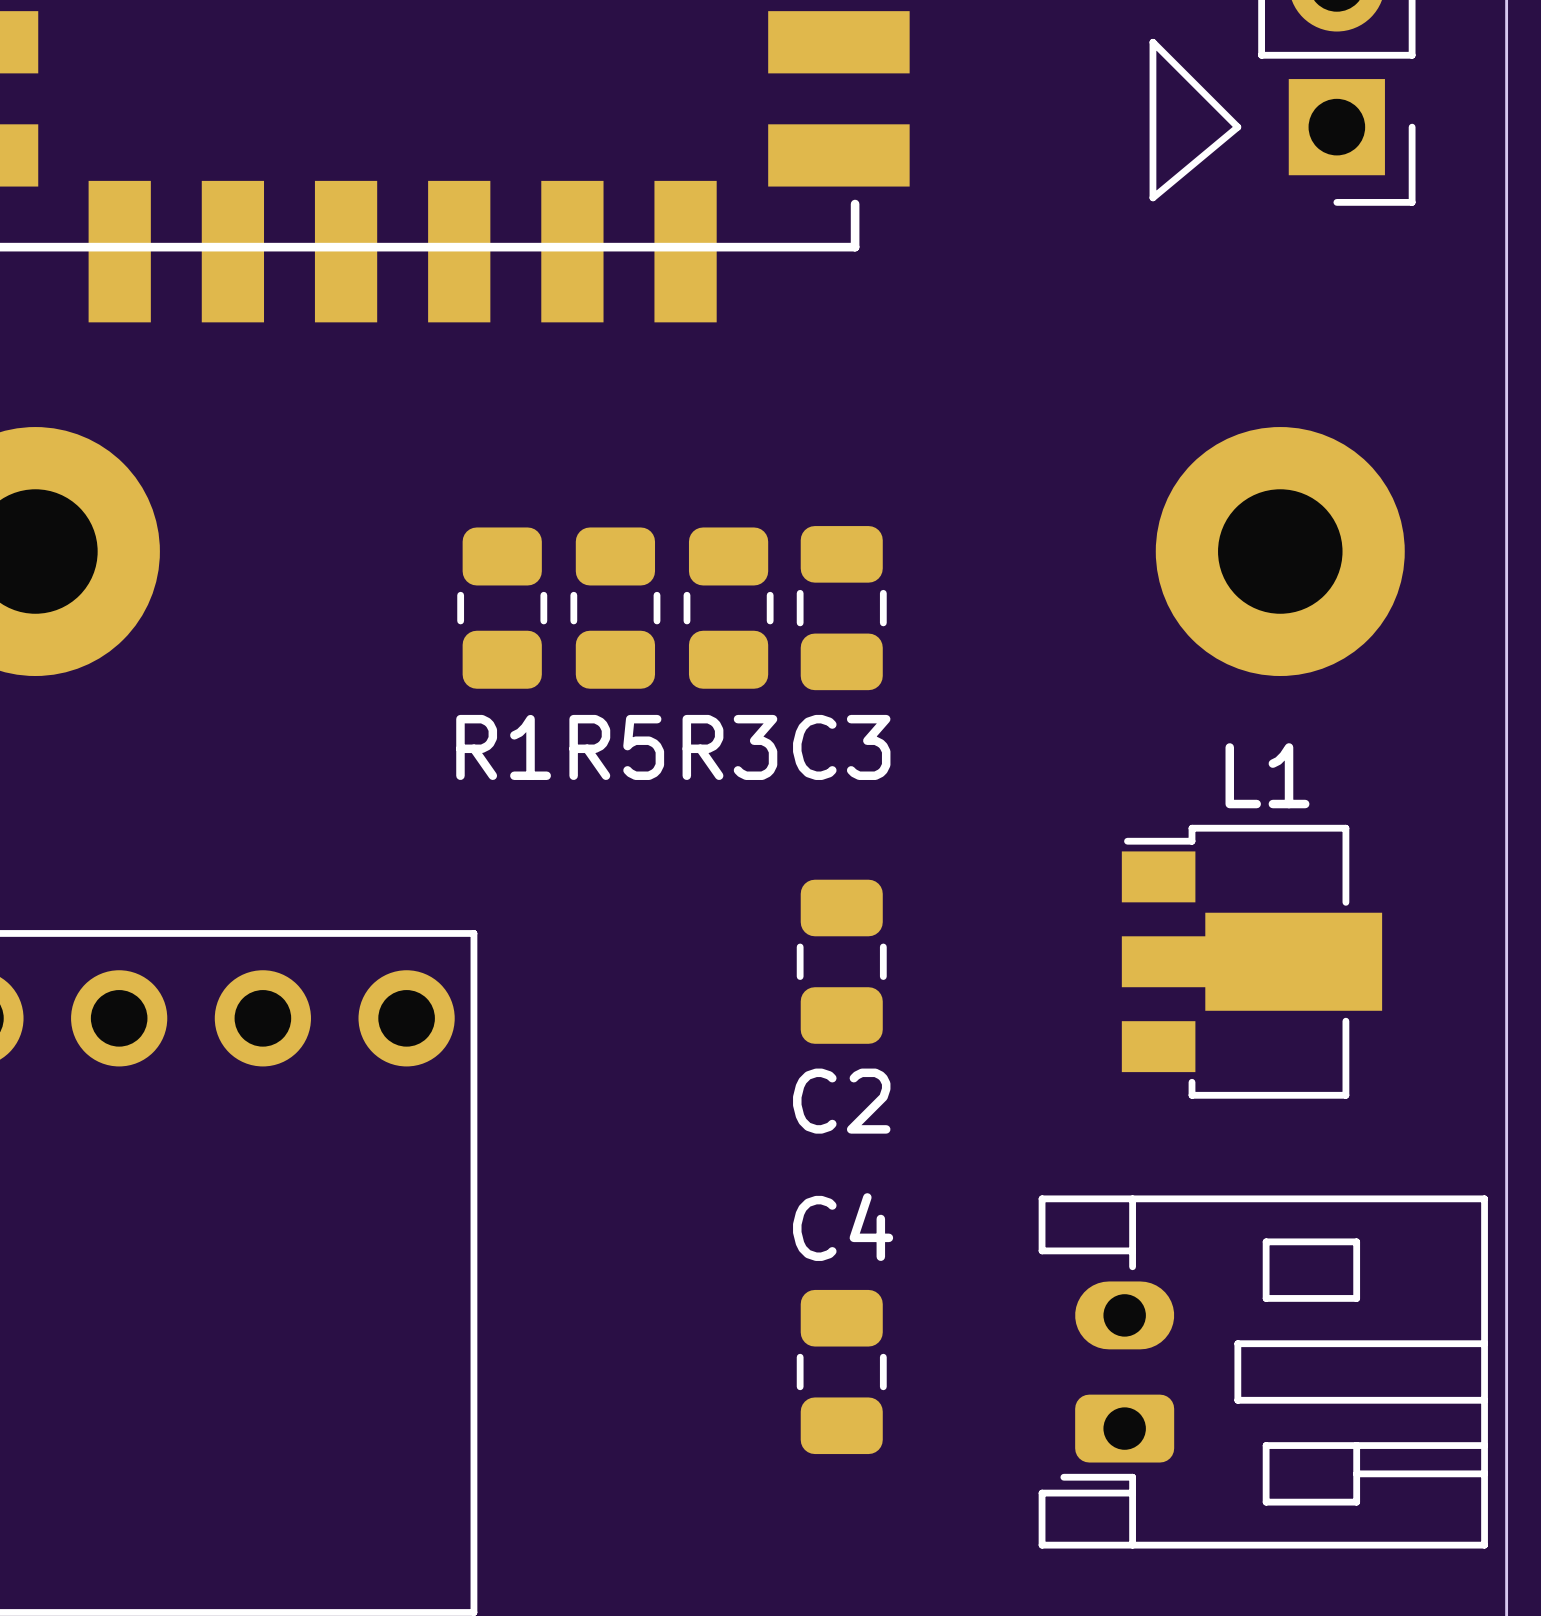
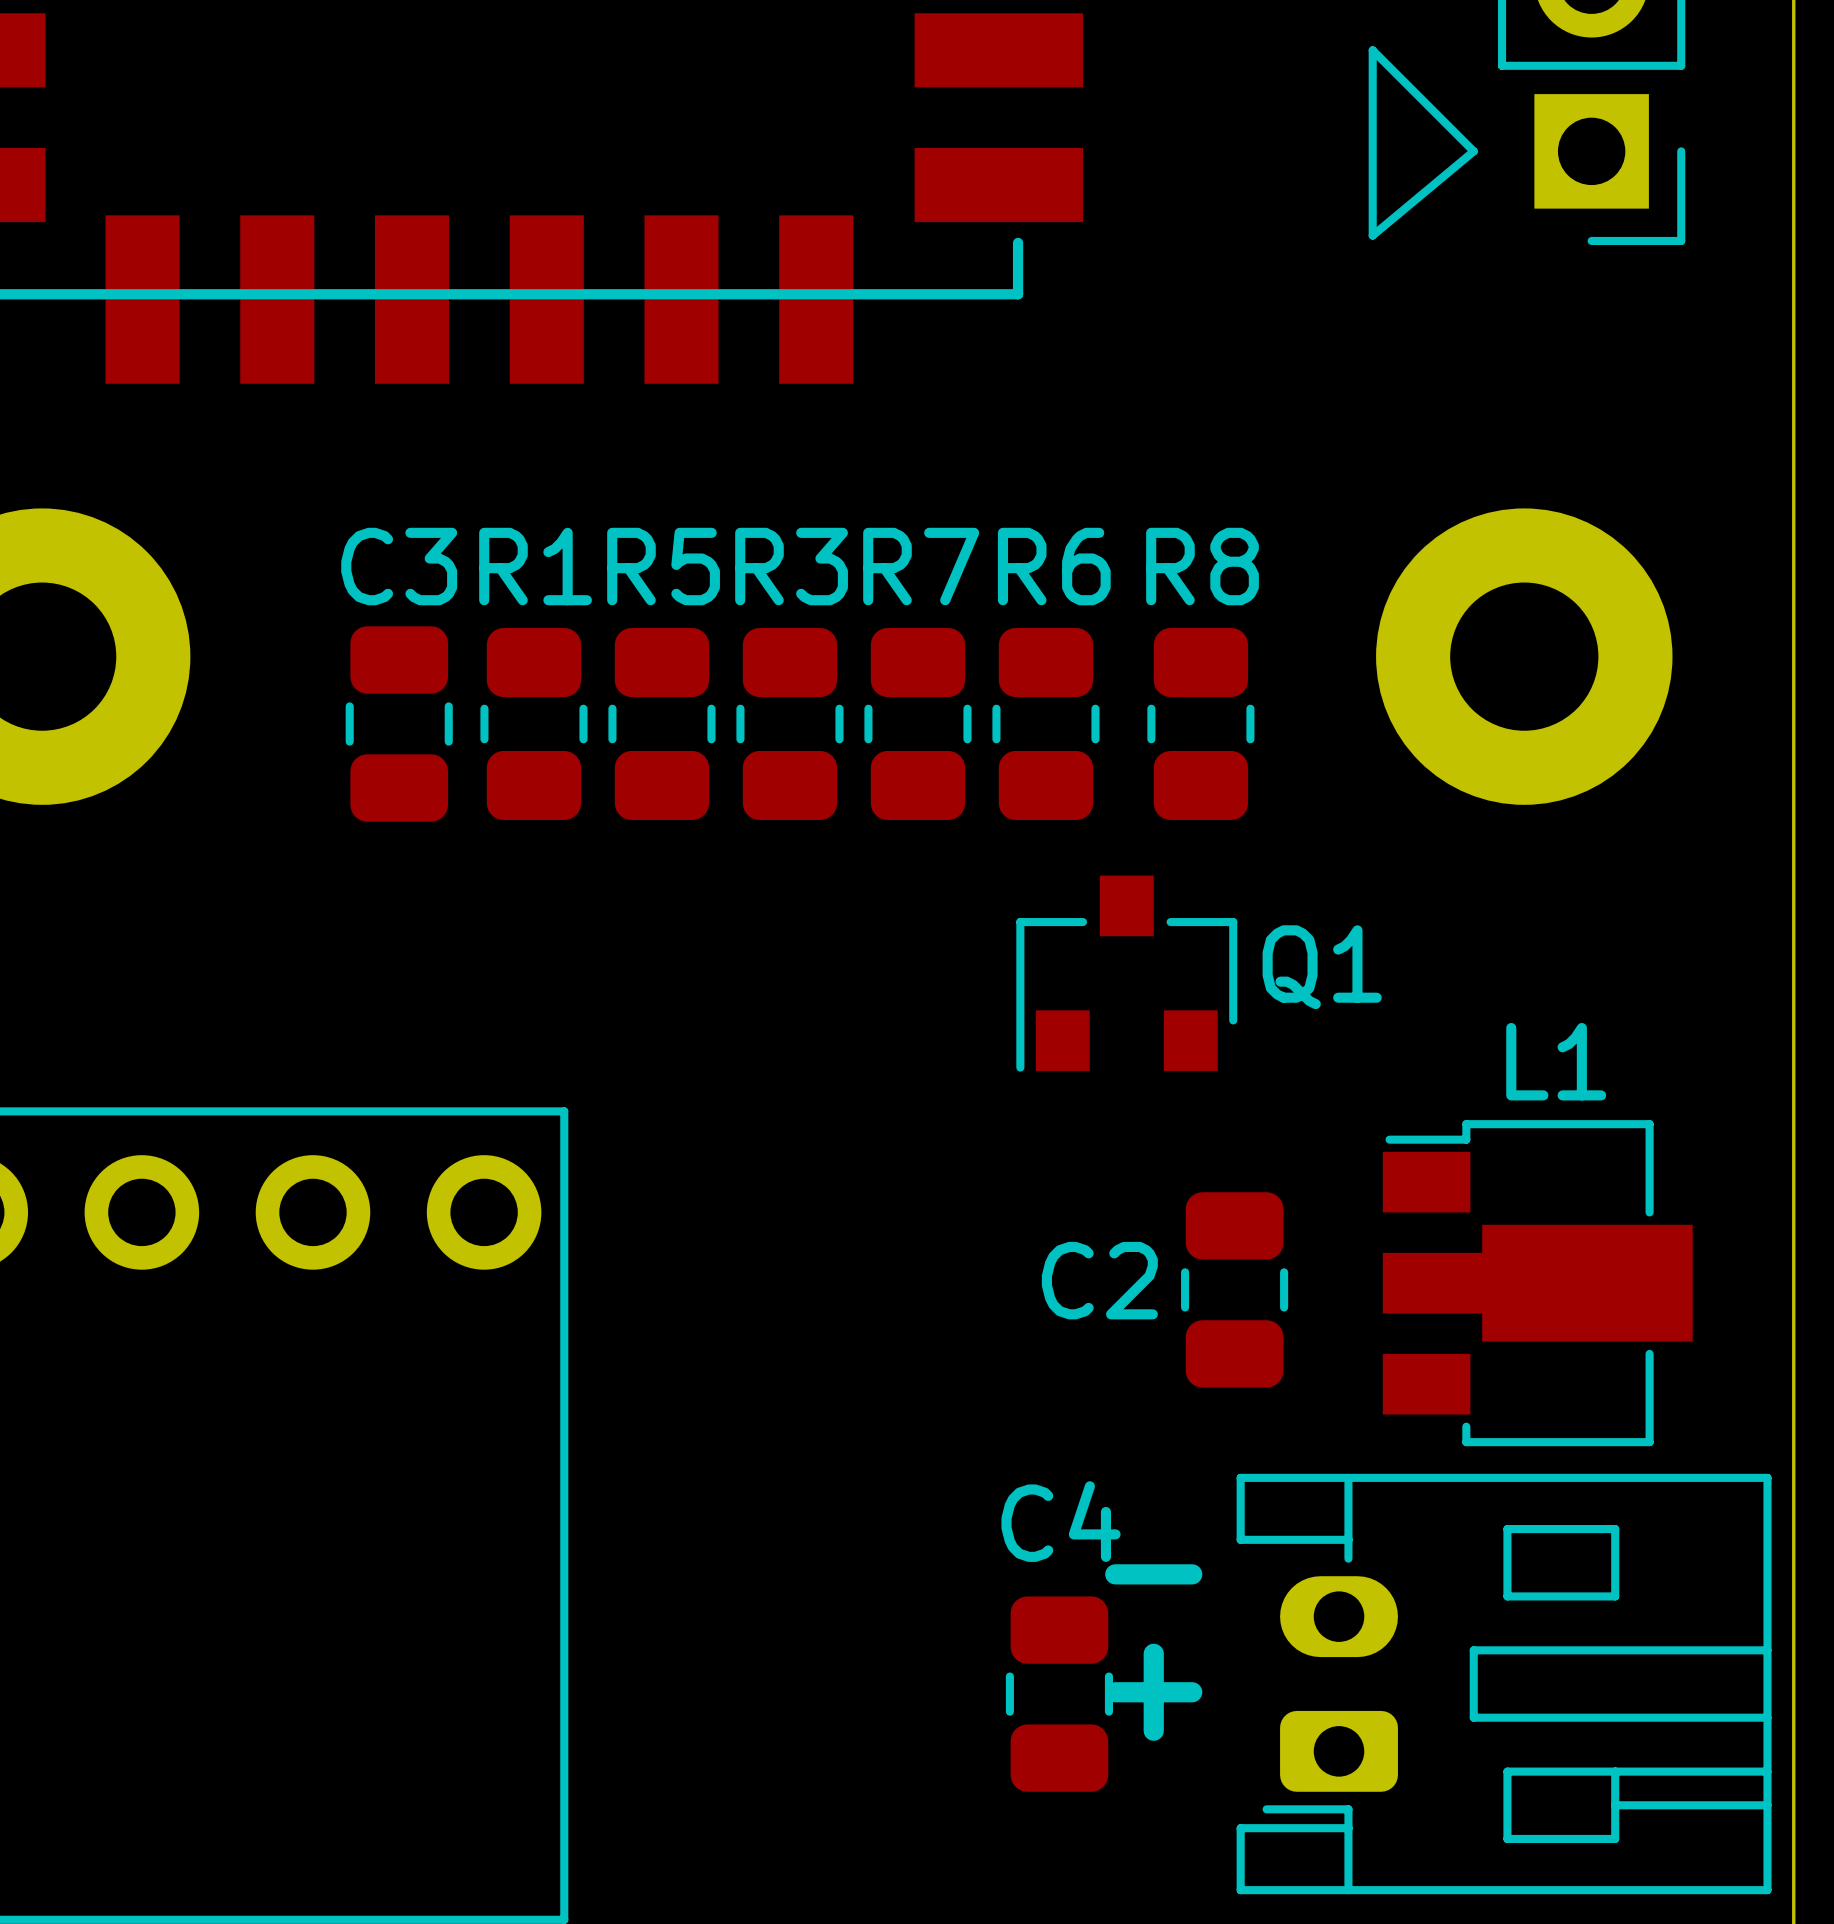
R1 position: (502, 608) -> (533, 724)
R5 position: (615, 608) -> (661, 724)
R3 position: (728, 608) -> (789, 724)
R7: none -> (917, 724)
C3 position: (841, 608) -> (399, 724)
R6: none -> (1045, 724)
R8: none -> (1200, 724)
R1 name position: R1 (503, 747) -> R1 (535, 566)
R5 name position: R5 (616, 747) -> R5 (663, 566)
R3 name position: R3 (729, 747) -> R3 (791, 566)
C3 name position: C3 (841, 747) -> C3 (399, 566)
Q1: none -> (1126, 973)
C2 position: (841, 961) -> (1234, 1289)
L1 position: (1251, 961) -> (1537, 1283)
C2 name position: C2 (841, 1101) -> C2 (1099, 1280)
text: none -> - (1153, 1574)
C4 position: (841, 1371) -> (1059, 1694)
part position: (1263, 1371) -> (1504, 1684)
text: none -> + (1153, 1692)

